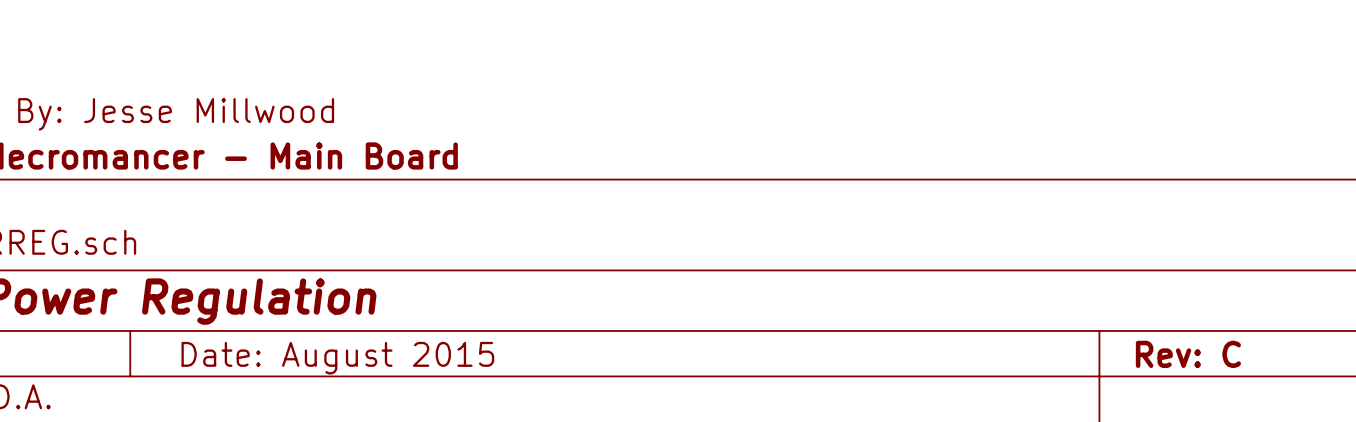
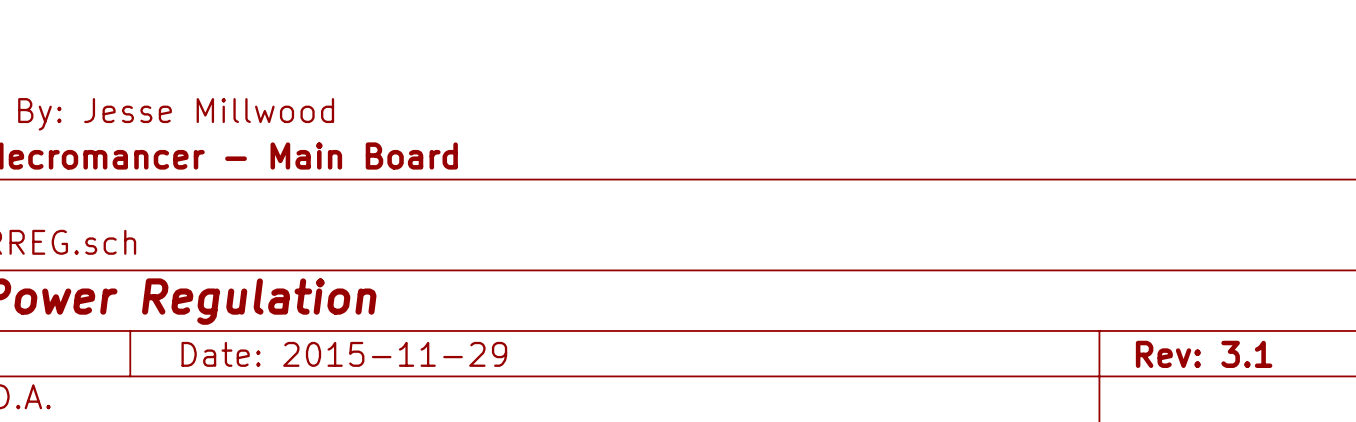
title block: Rev: C (1188, 354) -> Rev: 3.1 (1204, 354)
title block: Date: August 2015 (337, 358) -> Date: 2015-11-29 (344, 354)

